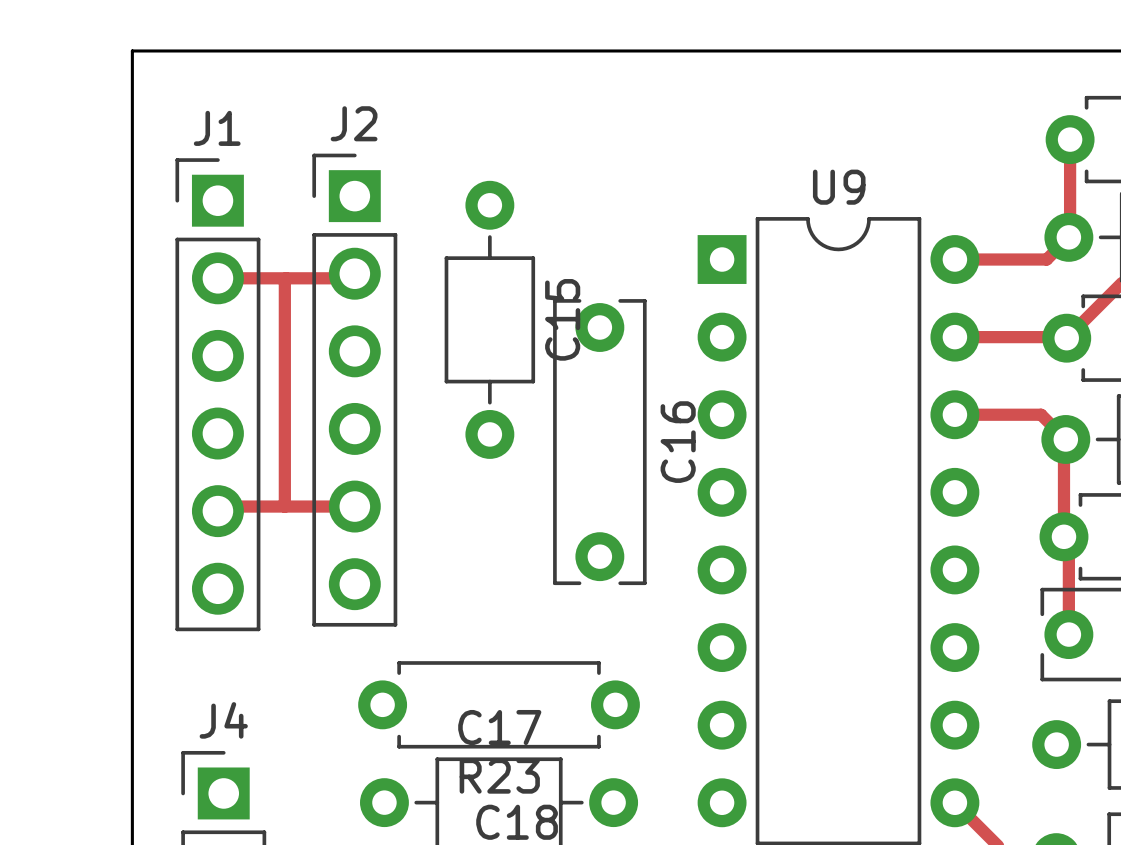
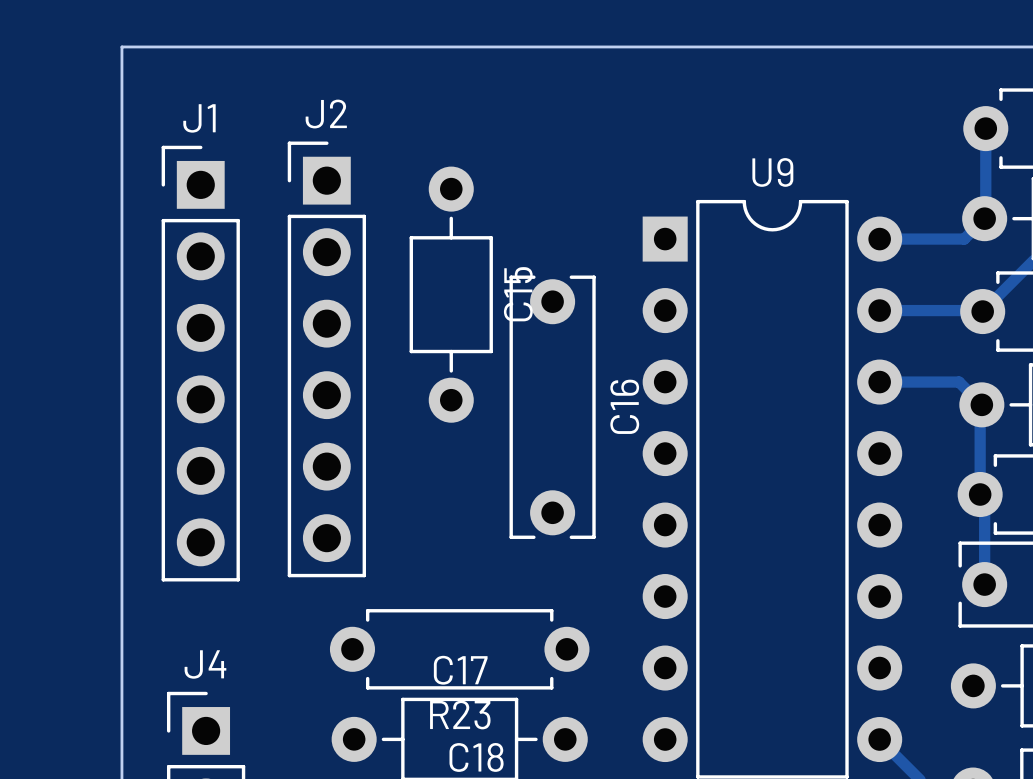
track: (354, 273) (350, 278) (217, 278) -> none
track: (286, 278) (284, 279) (284, 506) -> none
track: (354, 506) (222, 506) (217, 511) -> none

